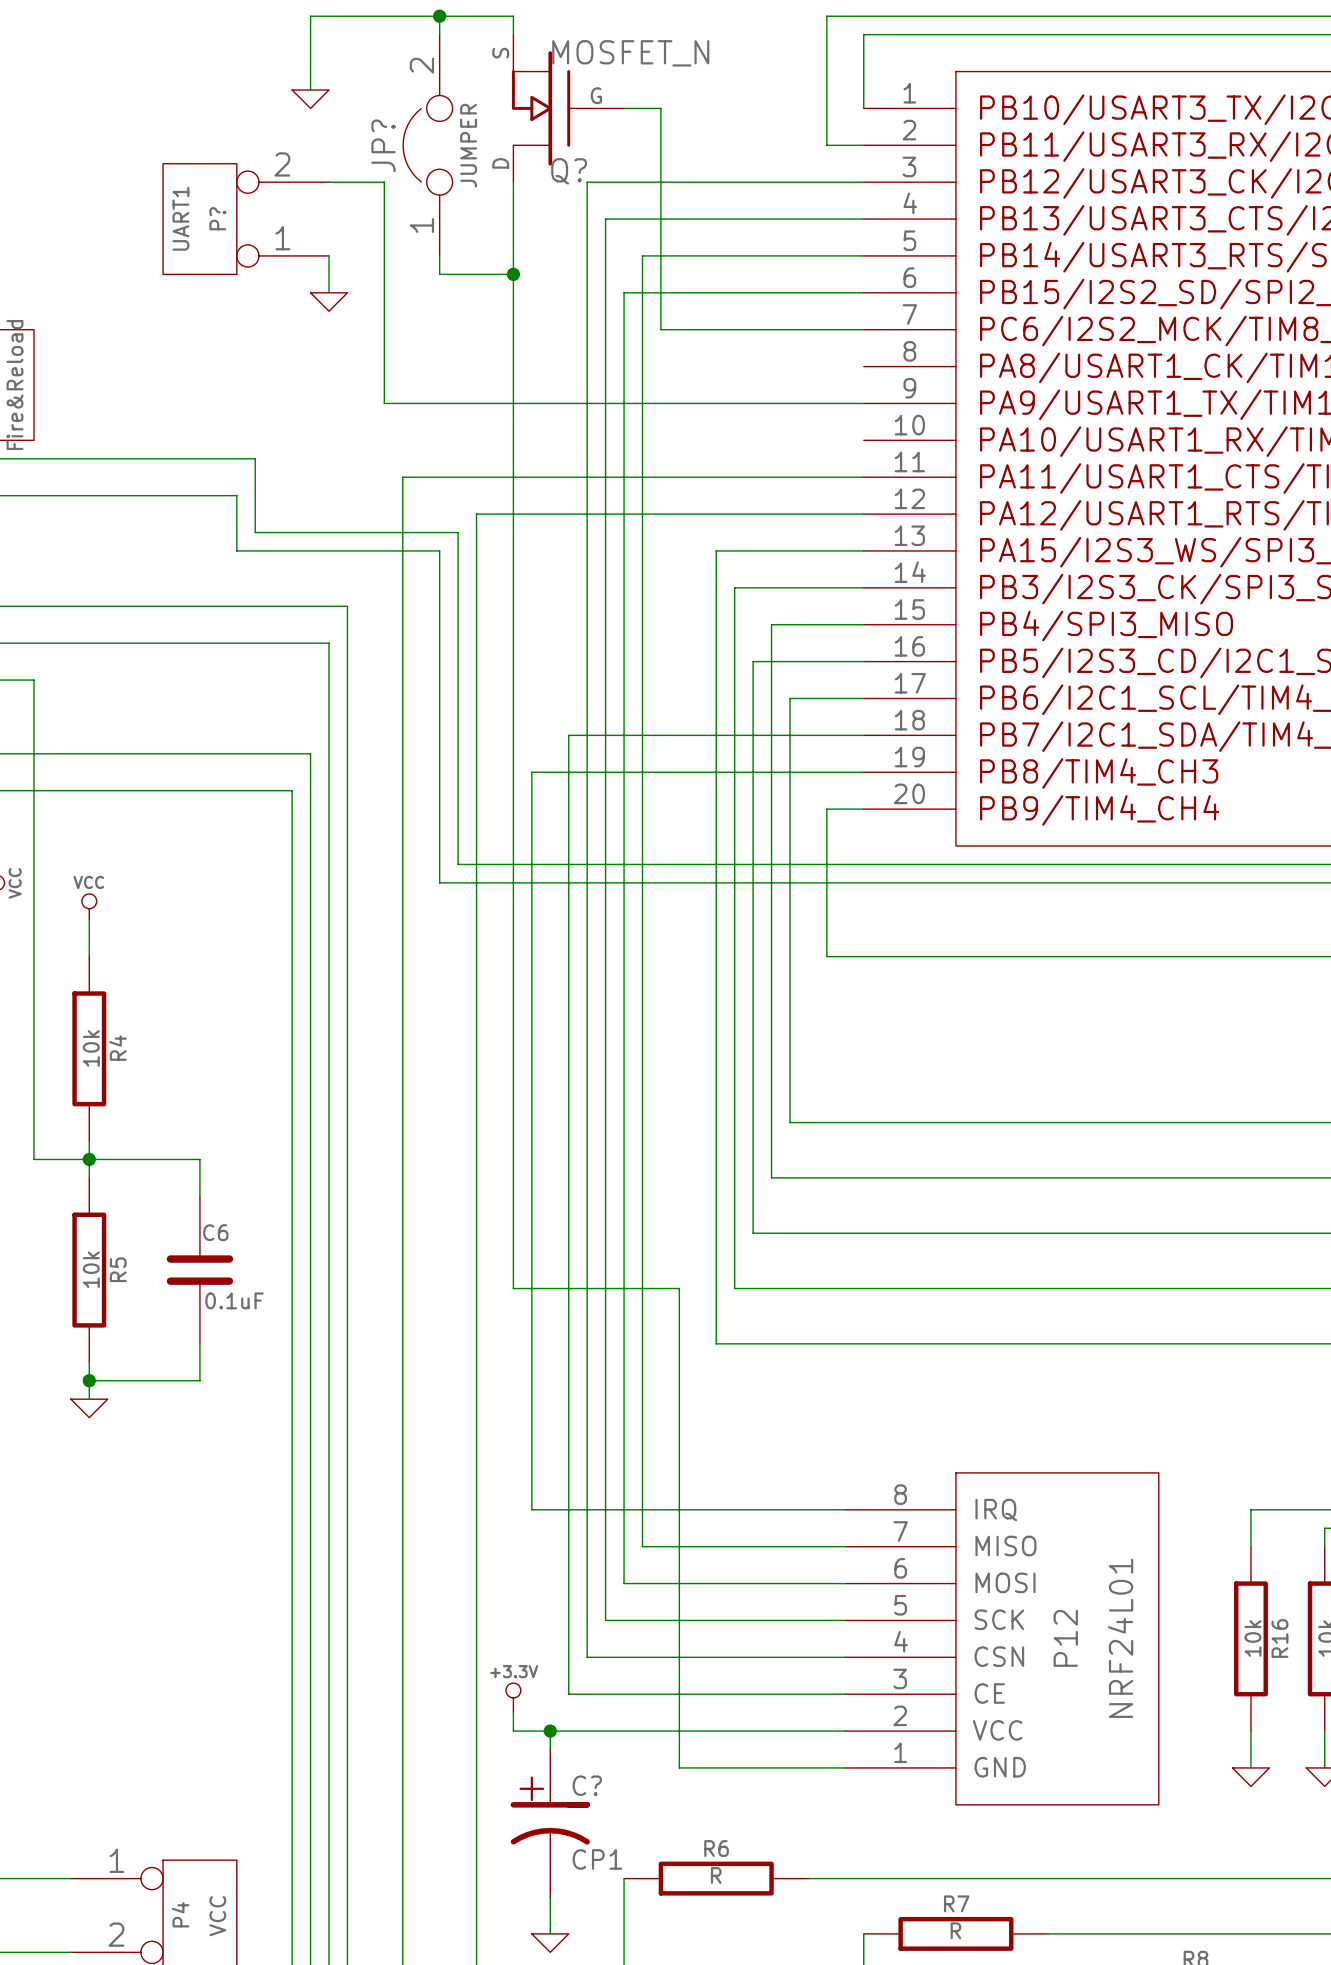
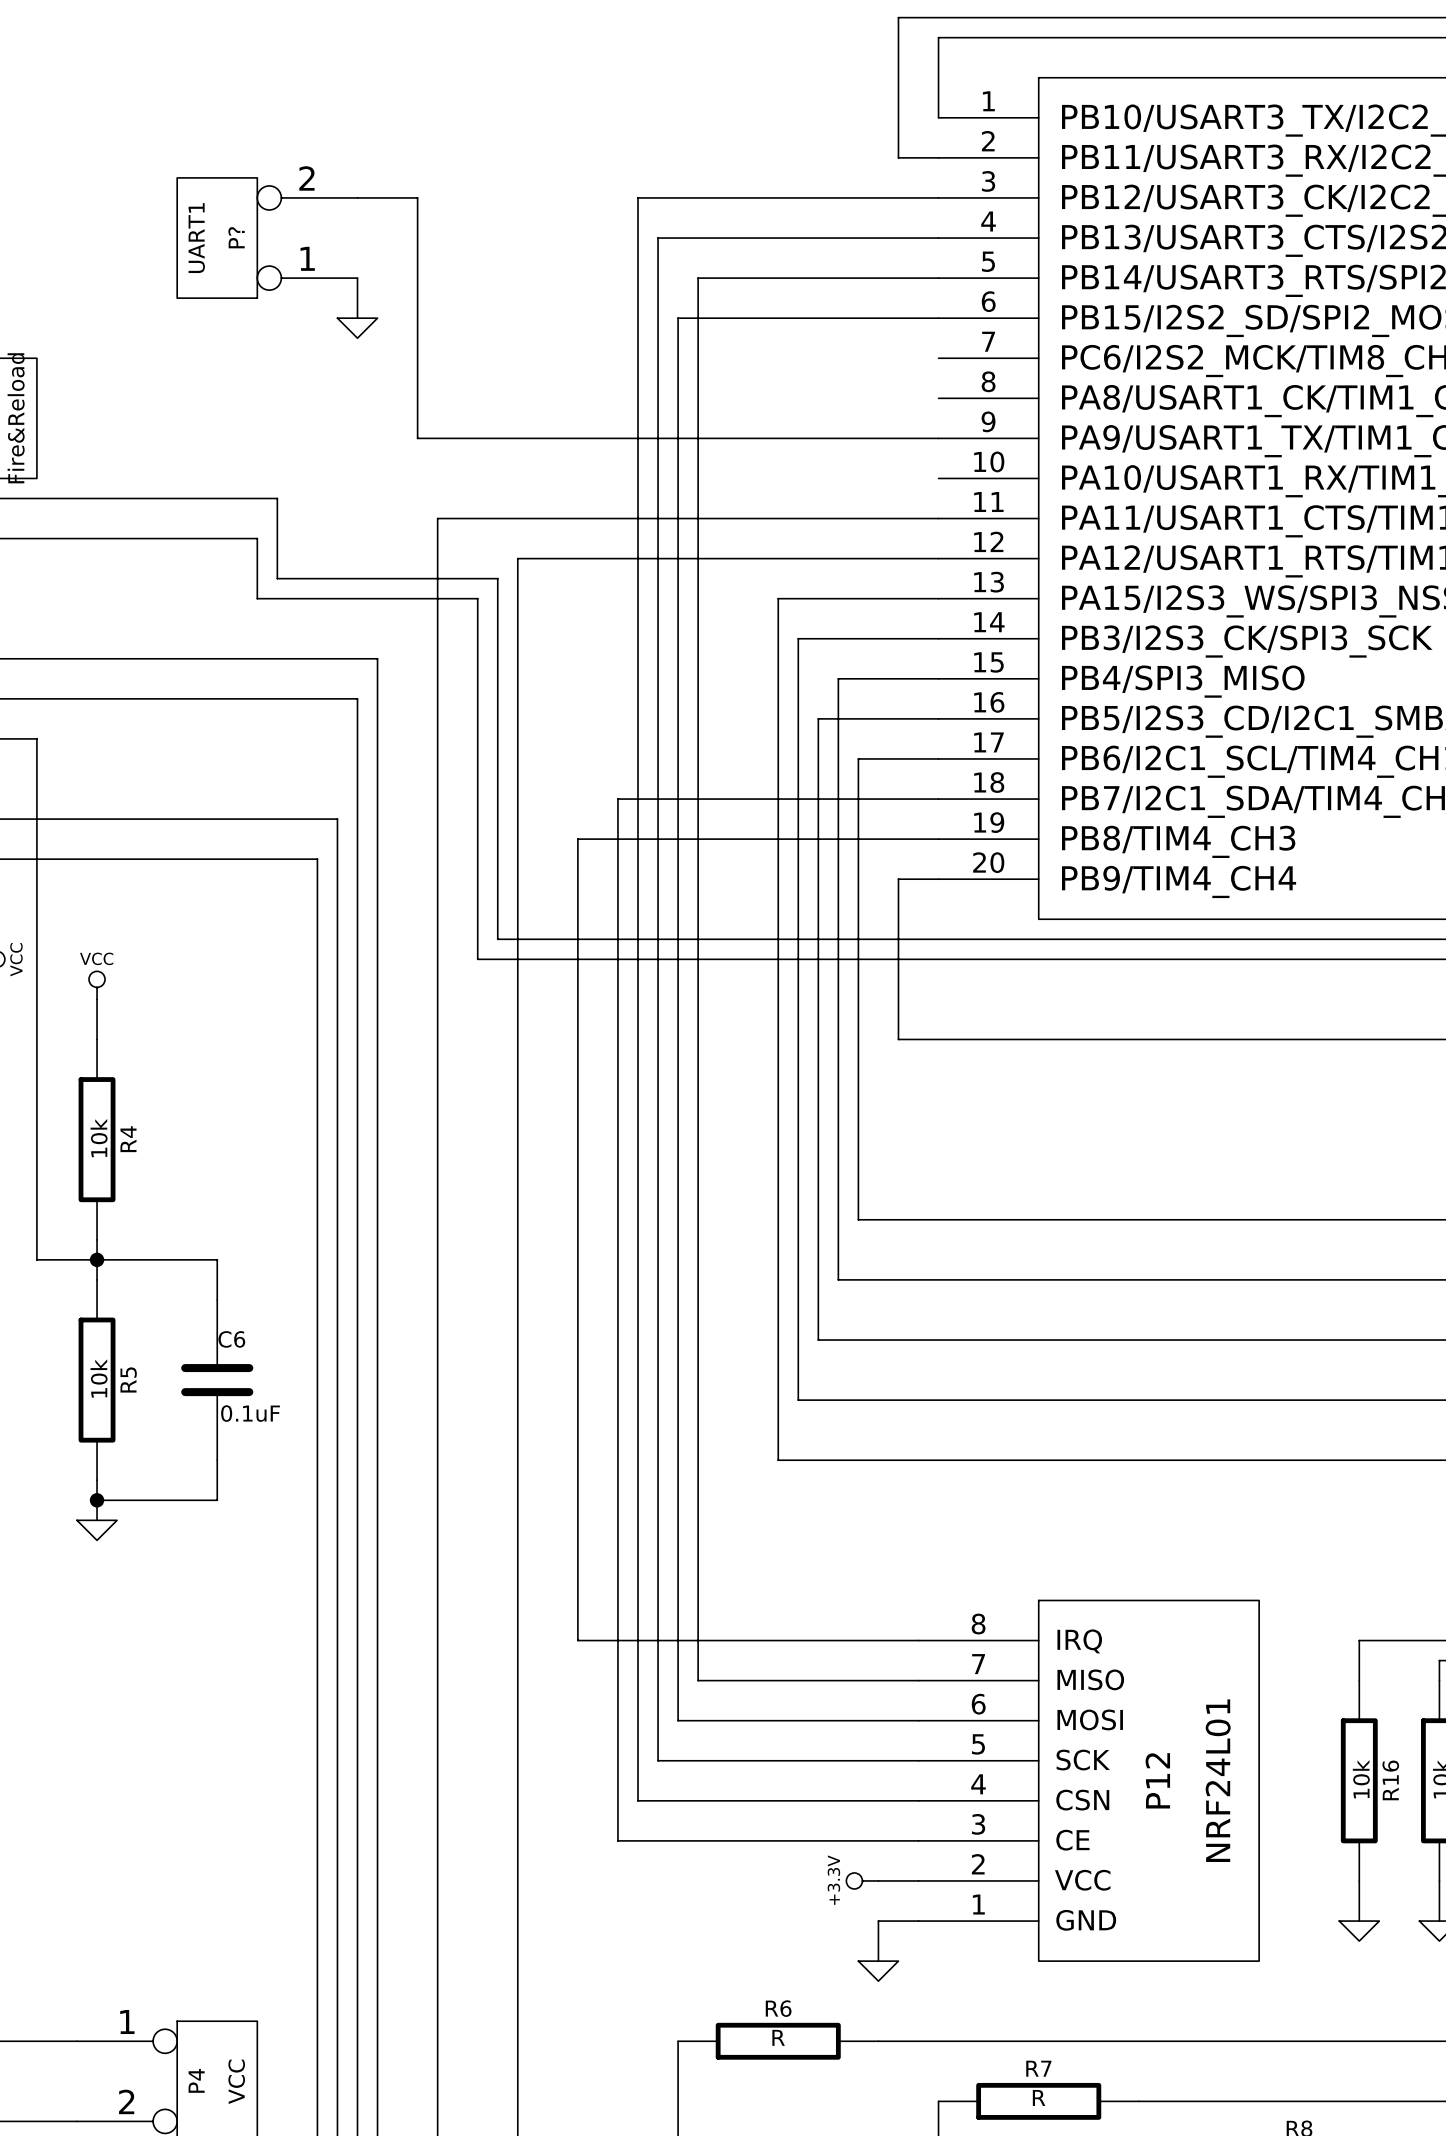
wire: (439, 16) (439, 34) -> none
junction: (439, 16) -> none
wire: (513, 34) (513, 16) (310, 16) (310, 89) -> none
power symbol: (310, 99) -> none
Q?: MOSFET_N (567, 108) -> none
wire: (624, 108) (660, 108) (660, 329) (863, 329) -> none
JP?: JUMPER (427, 145) -> none
wire: (513, 182) (513, 1288) (679, 1288) (679, 1767) (808, 1767) -> (878, 1961) (878, 1921)
wire: (439, 255) (439, 274) (513, 274) -> none
junction: (513, 274) -> none
power symbol rotation: 0° (513, 1697) -> 90° counterclockwise (862, 1880)
power symbol position: +3.3V (513, 1697) -> +3.3V (862, 1880)
wire: (513, 1712) (513, 1731) (808, 1731) -> none
wire: (550, 1731) (550, 1749) -> none
junction: (550, 1731) -> none
C?: CP1 (550, 1823) -> none
wire: (550, 1897) (550, 1933) -> none
power symbol position: (550, 1943) -> (878, 1971)

